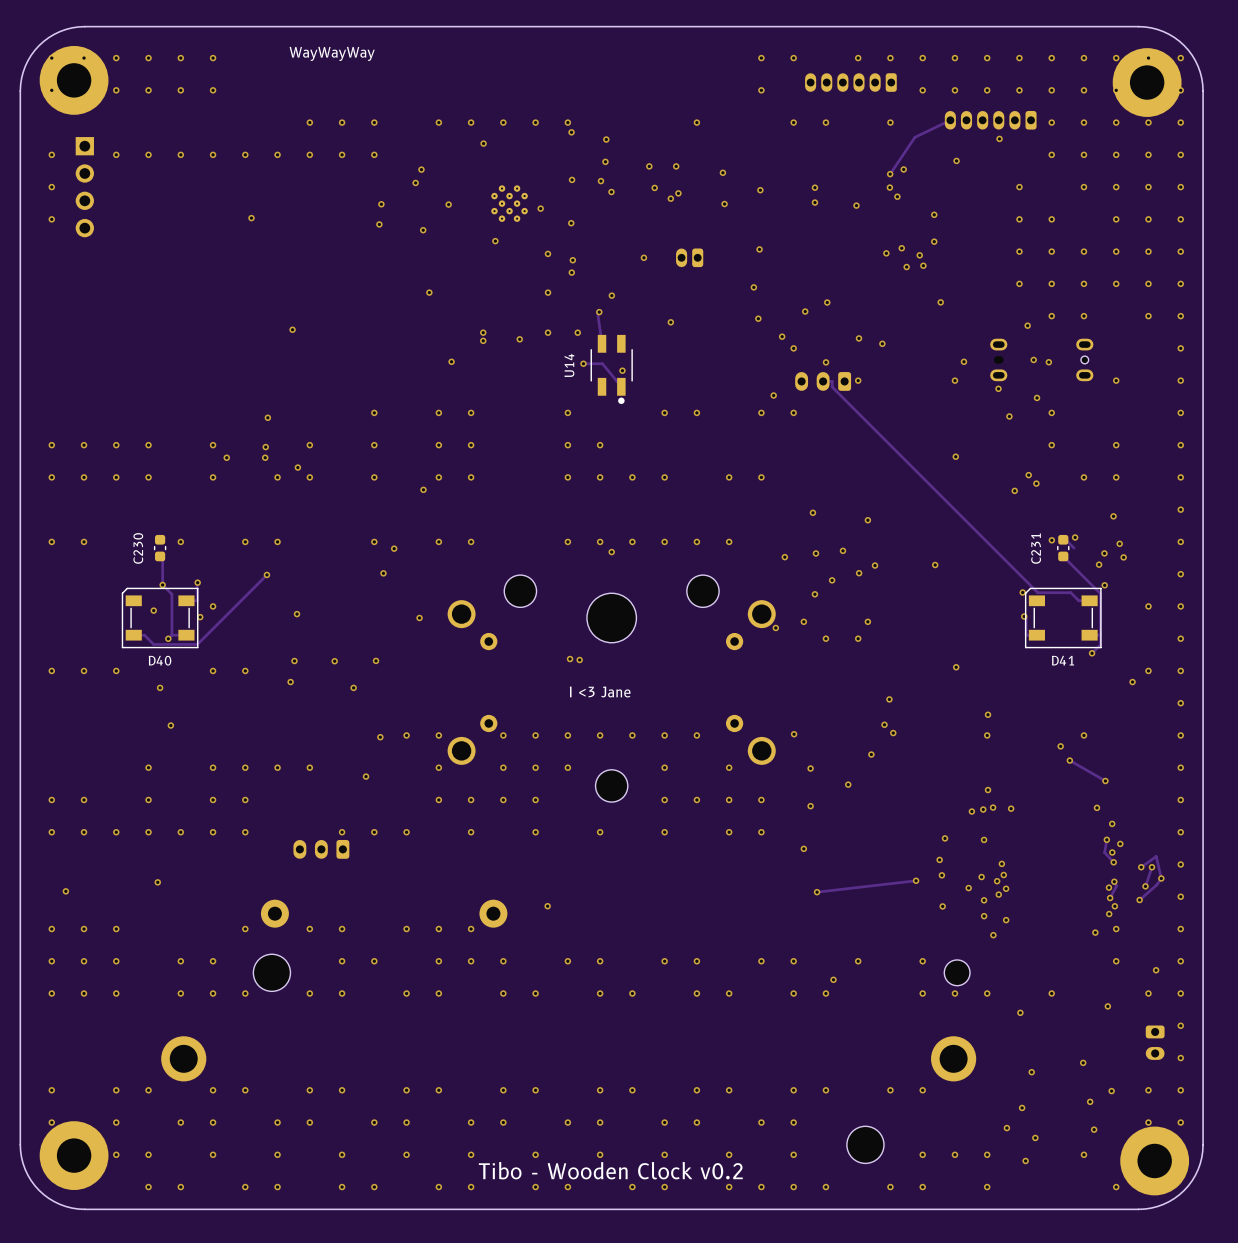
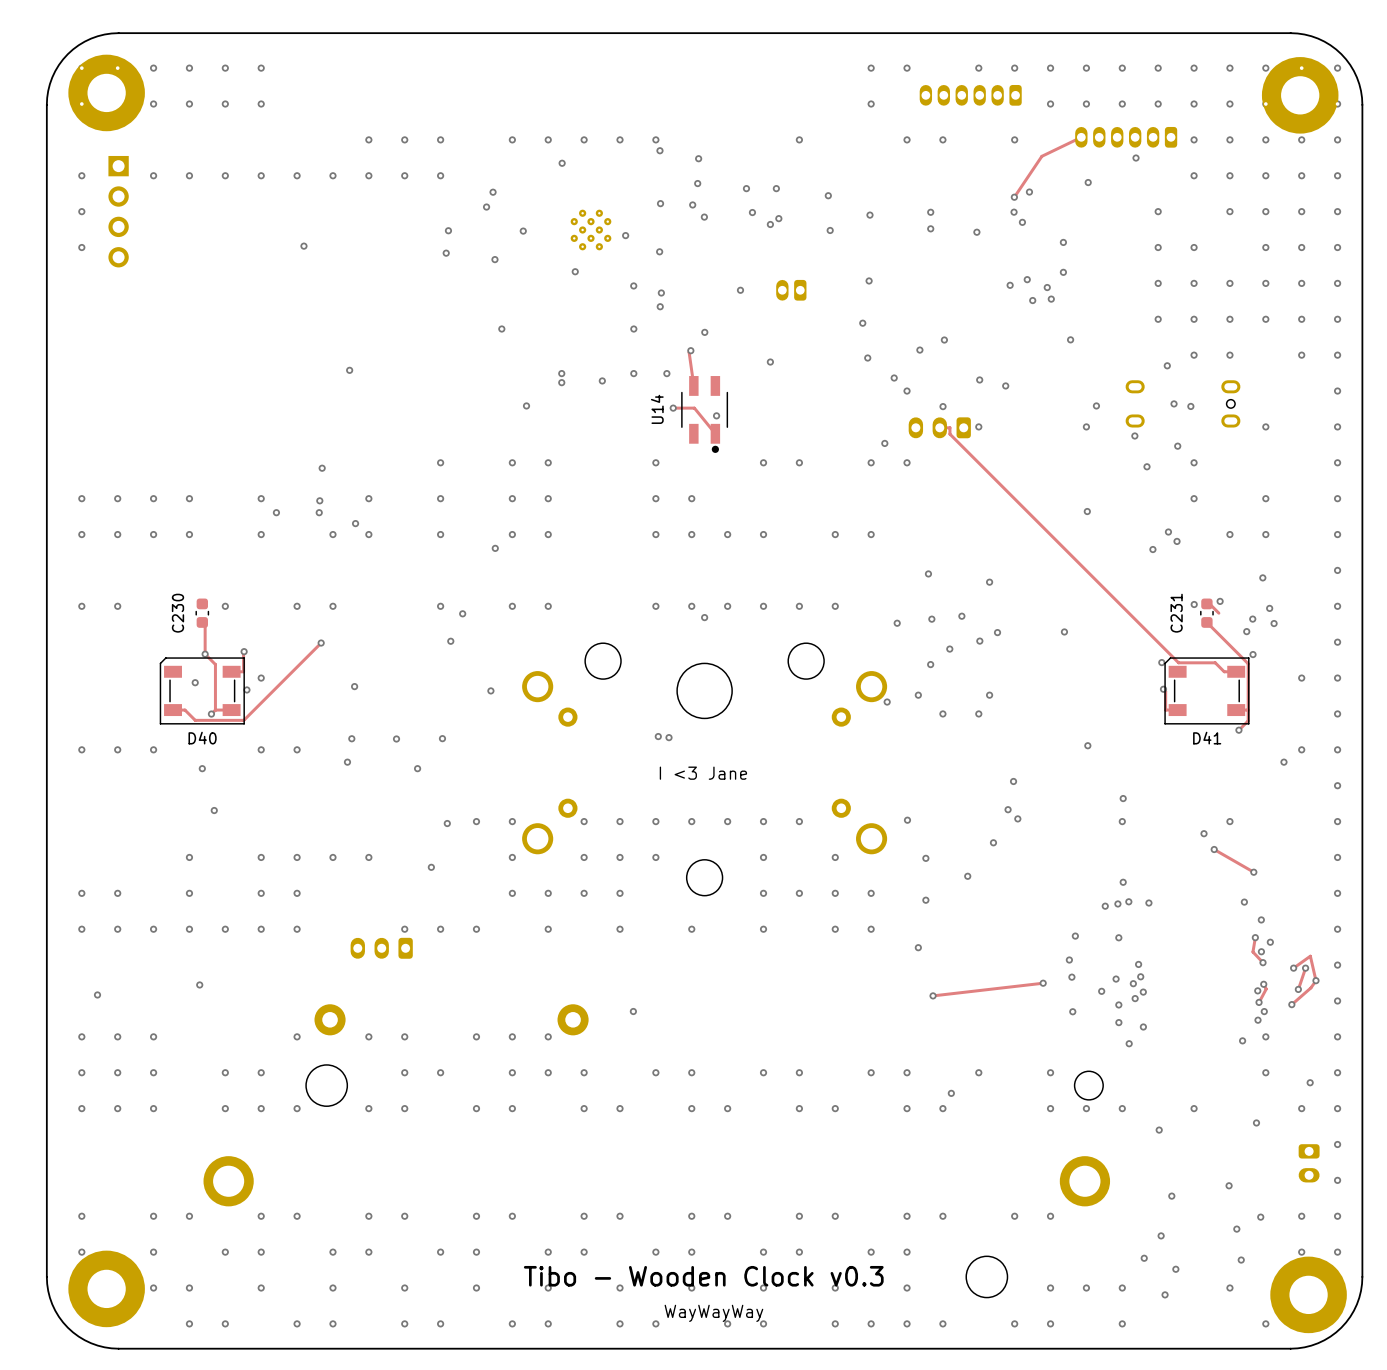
text: WayWayWay (332, 53) -> none
text: Tibo - Wooden Clock v0.2 (610, 1170) -> Tibo - Wooden Clock v0.3 (703, 1276)
text: none -> WayWayWay (713, 1313)

